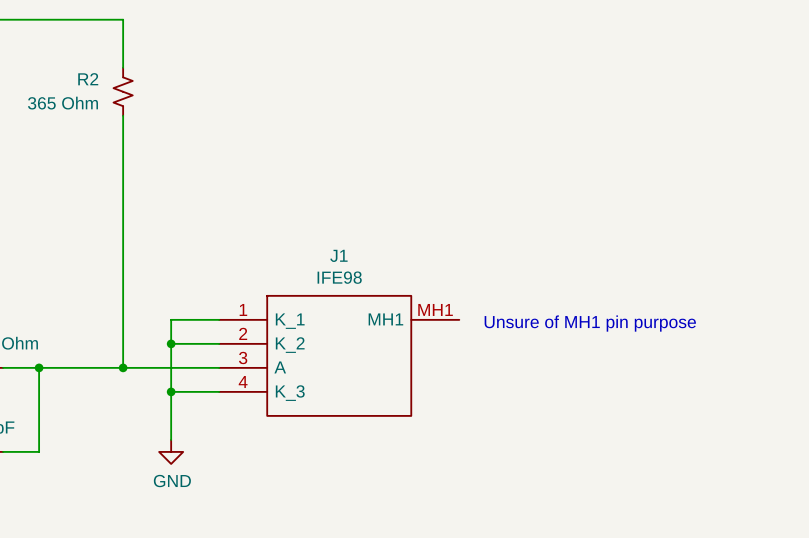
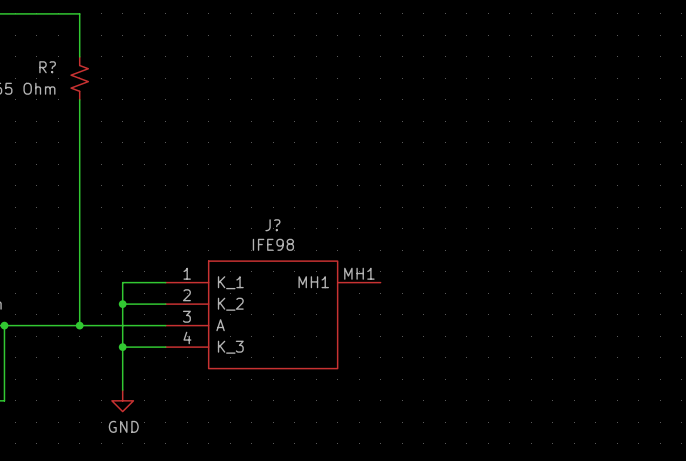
R2 name: R2 (88, 79) -> R? (47, 67)
J1 name: J1 (338, 255) -> J? (272, 225)
text: Unsure of MH1 pin purpose (590, 323) -> none

